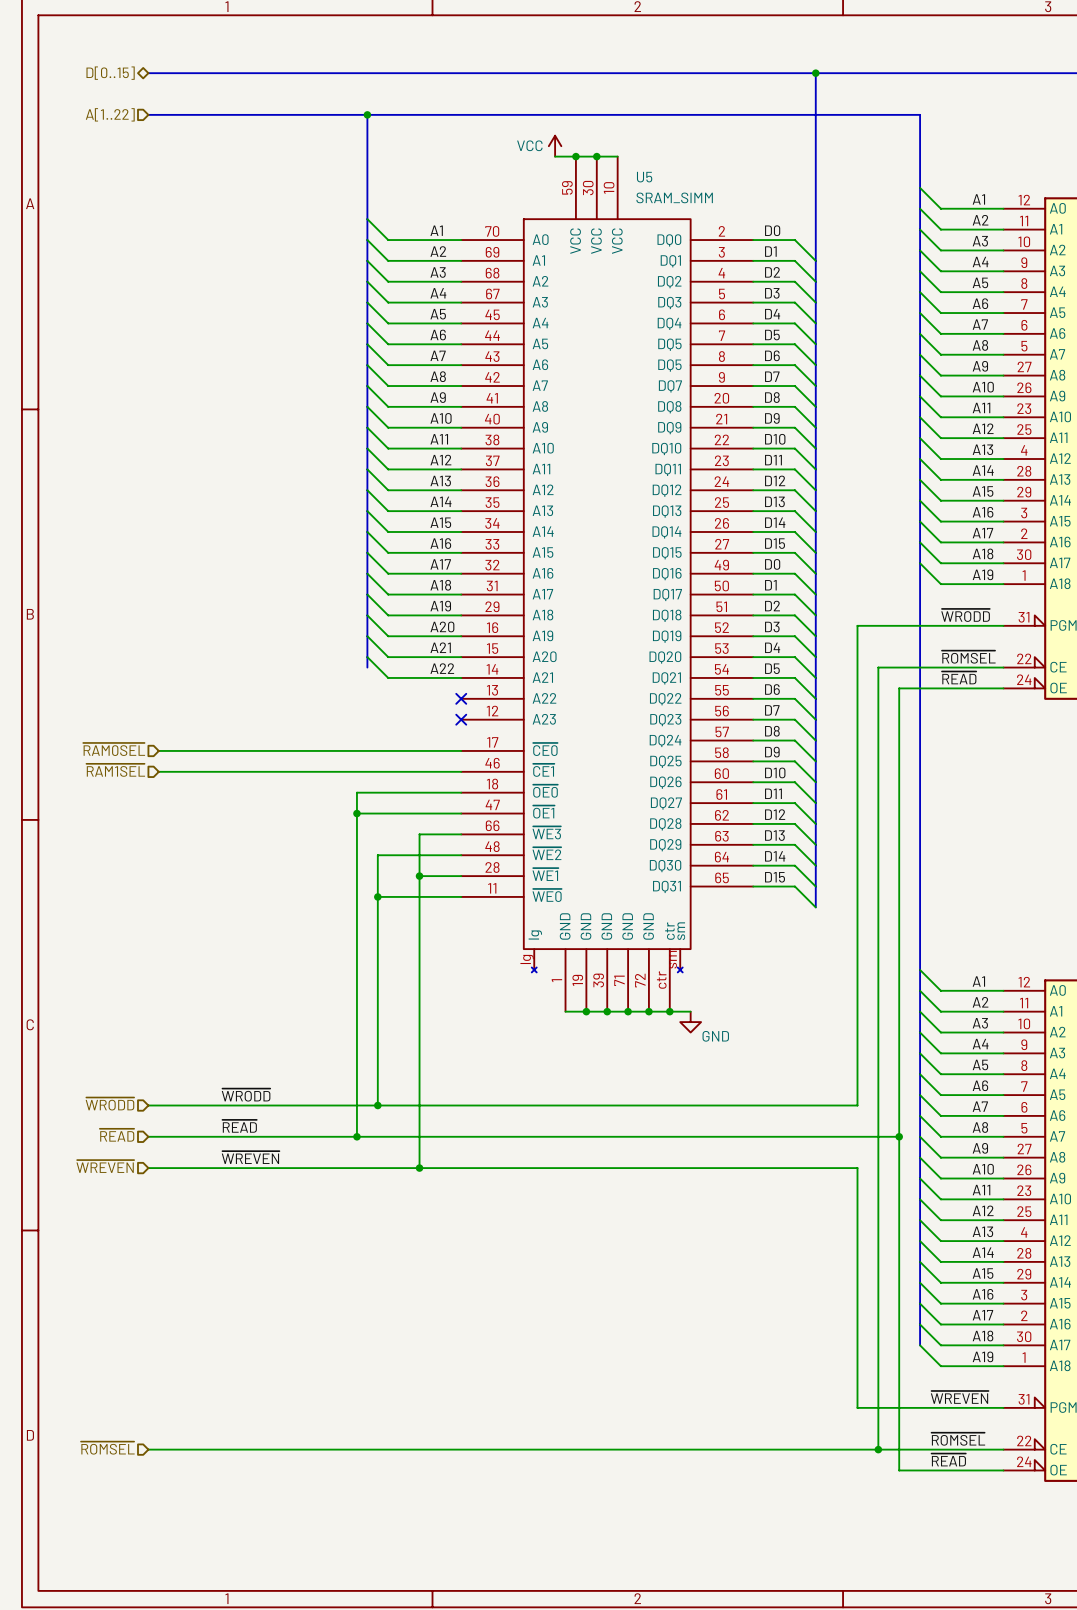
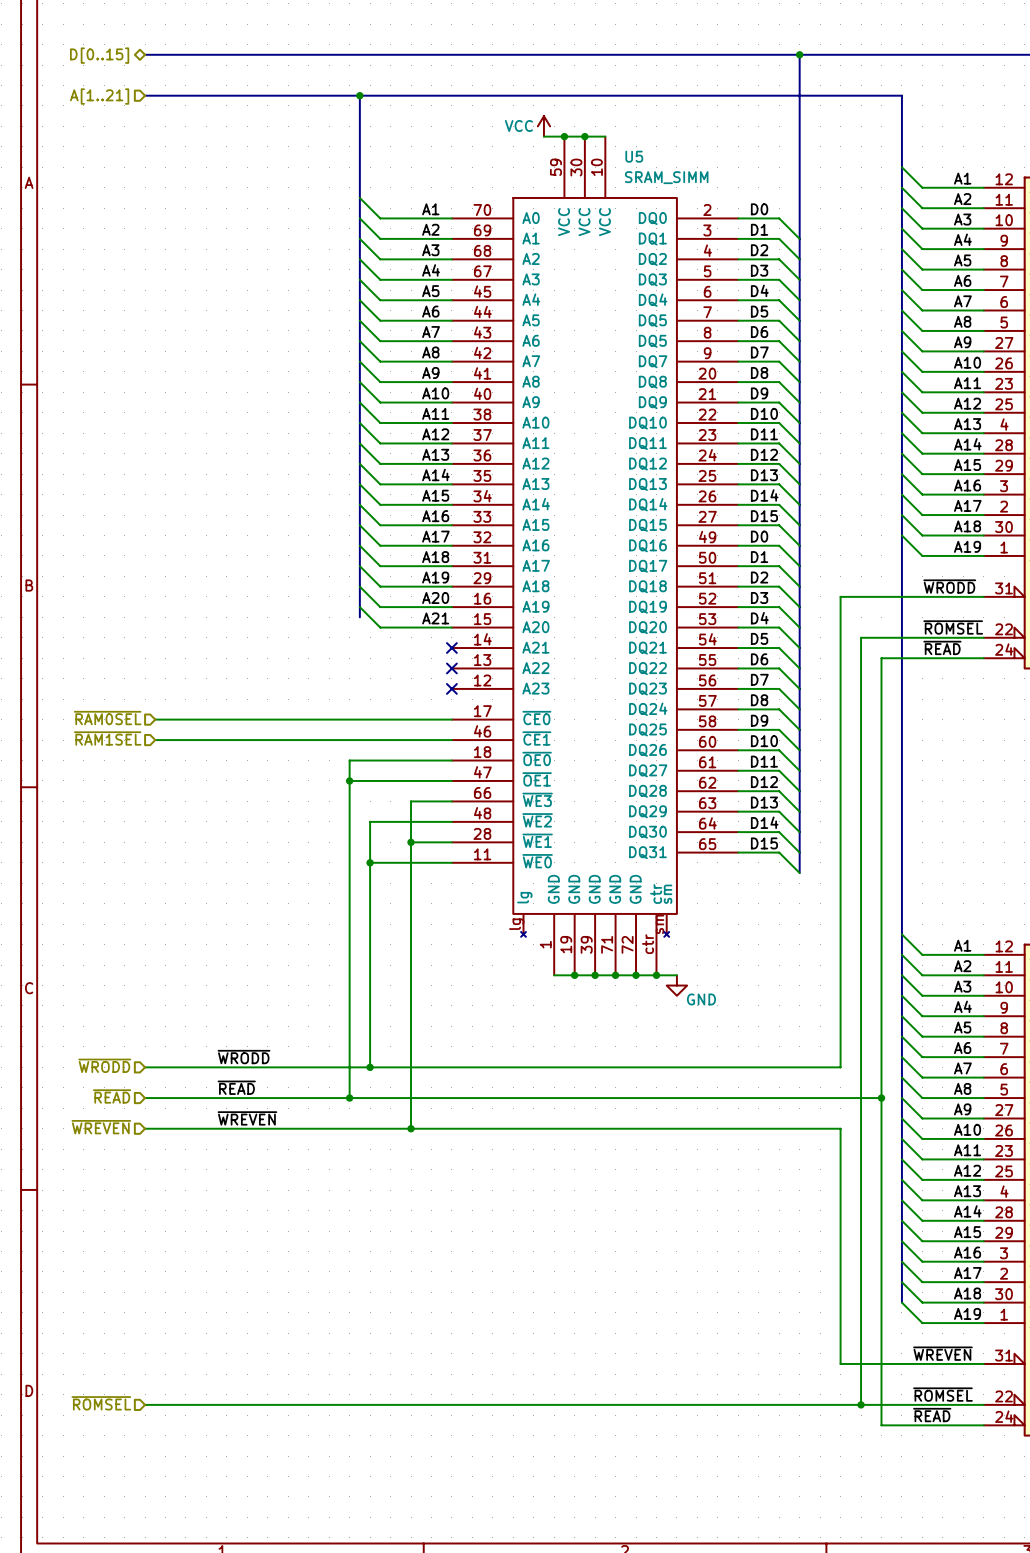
hierarchical label: A[1..22] (110, 114) -> A[1..21] (99, 96)
bus: (367, 646) (367, 667) -> none
wire: (367, 657) (388, 677) (461, 677) -> none
label: A22 (442, 668) -> none
no-connect mark: none -> (451, 648)

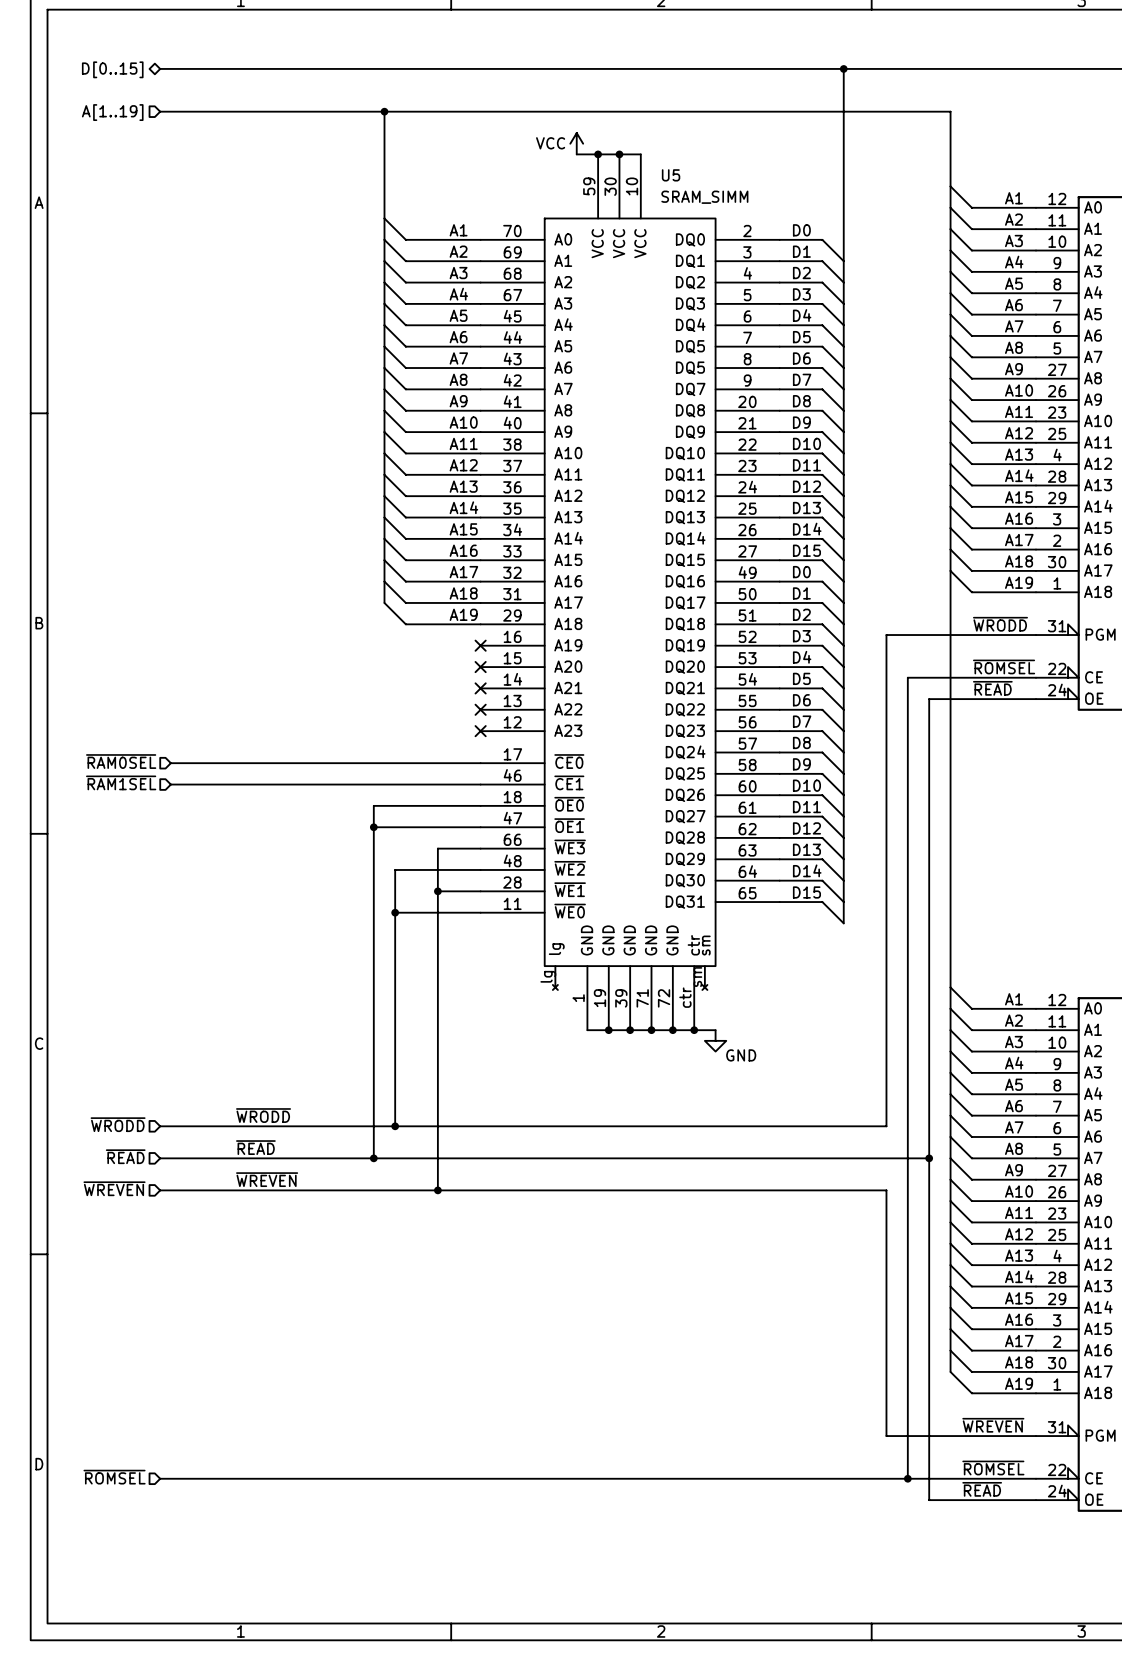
hierarchical label: A[1..21] (99, 96) -> A[1..19] (112, 112)
bus: (359, 566) (359, 617) -> none
wire: (359, 586) (380, 607) (451, 607) -> none
label: A20 (435, 597) -> none
wire: (359, 607) (380, 627) (451, 627) -> none
no-connect mark: none -> (480, 645)
label: A21 (435, 618) -> none
no-connect mark: none -> (480, 667)

